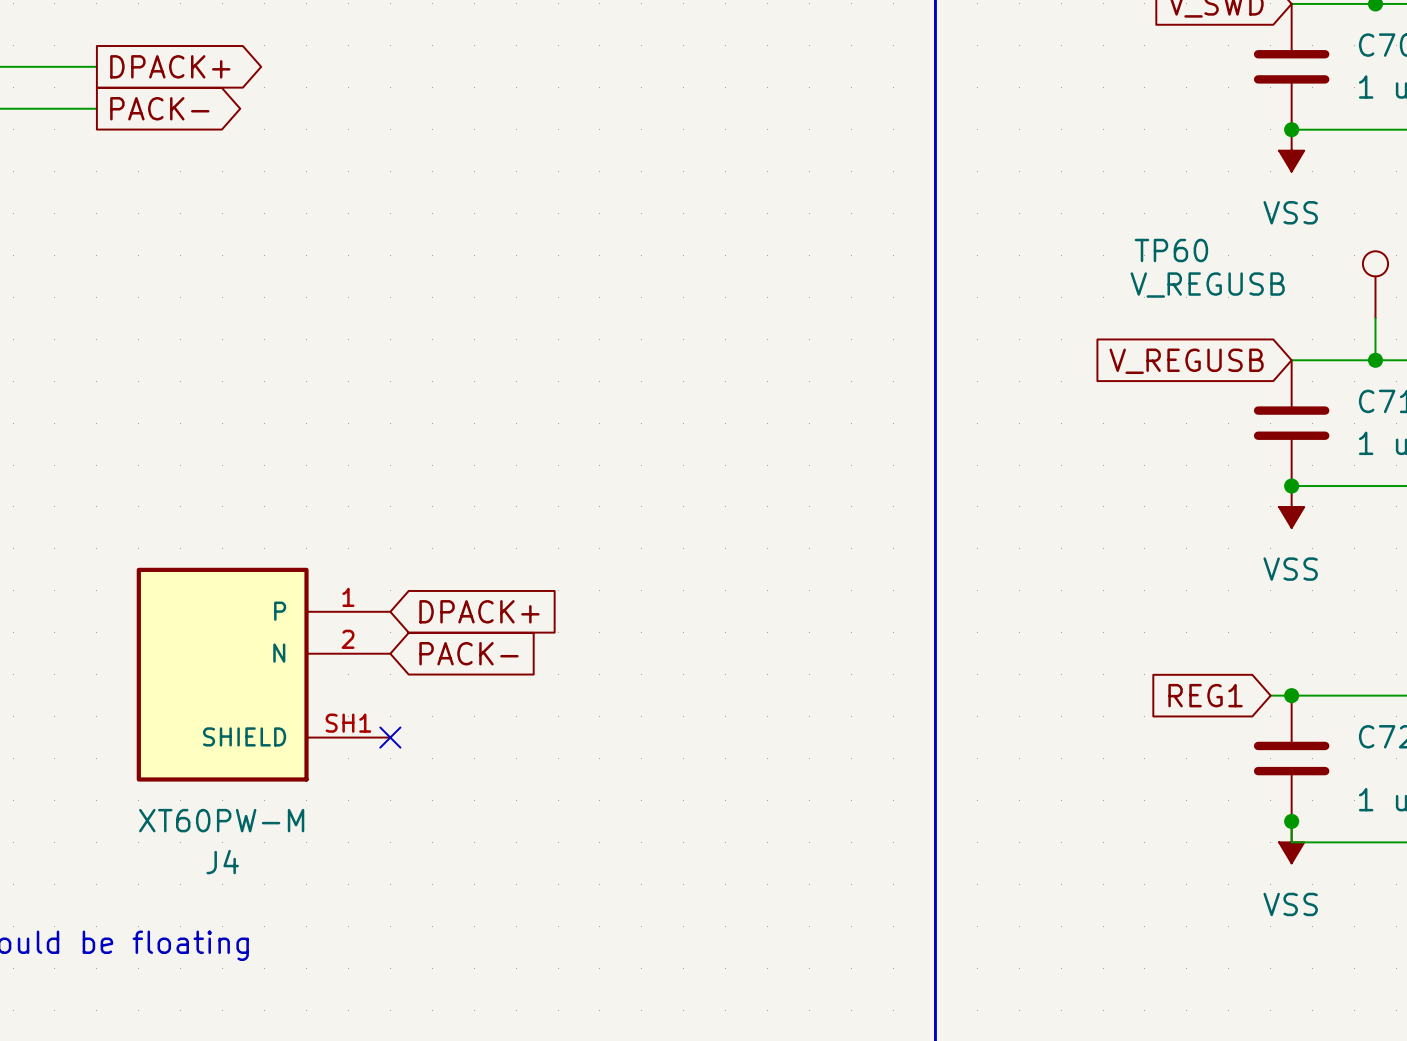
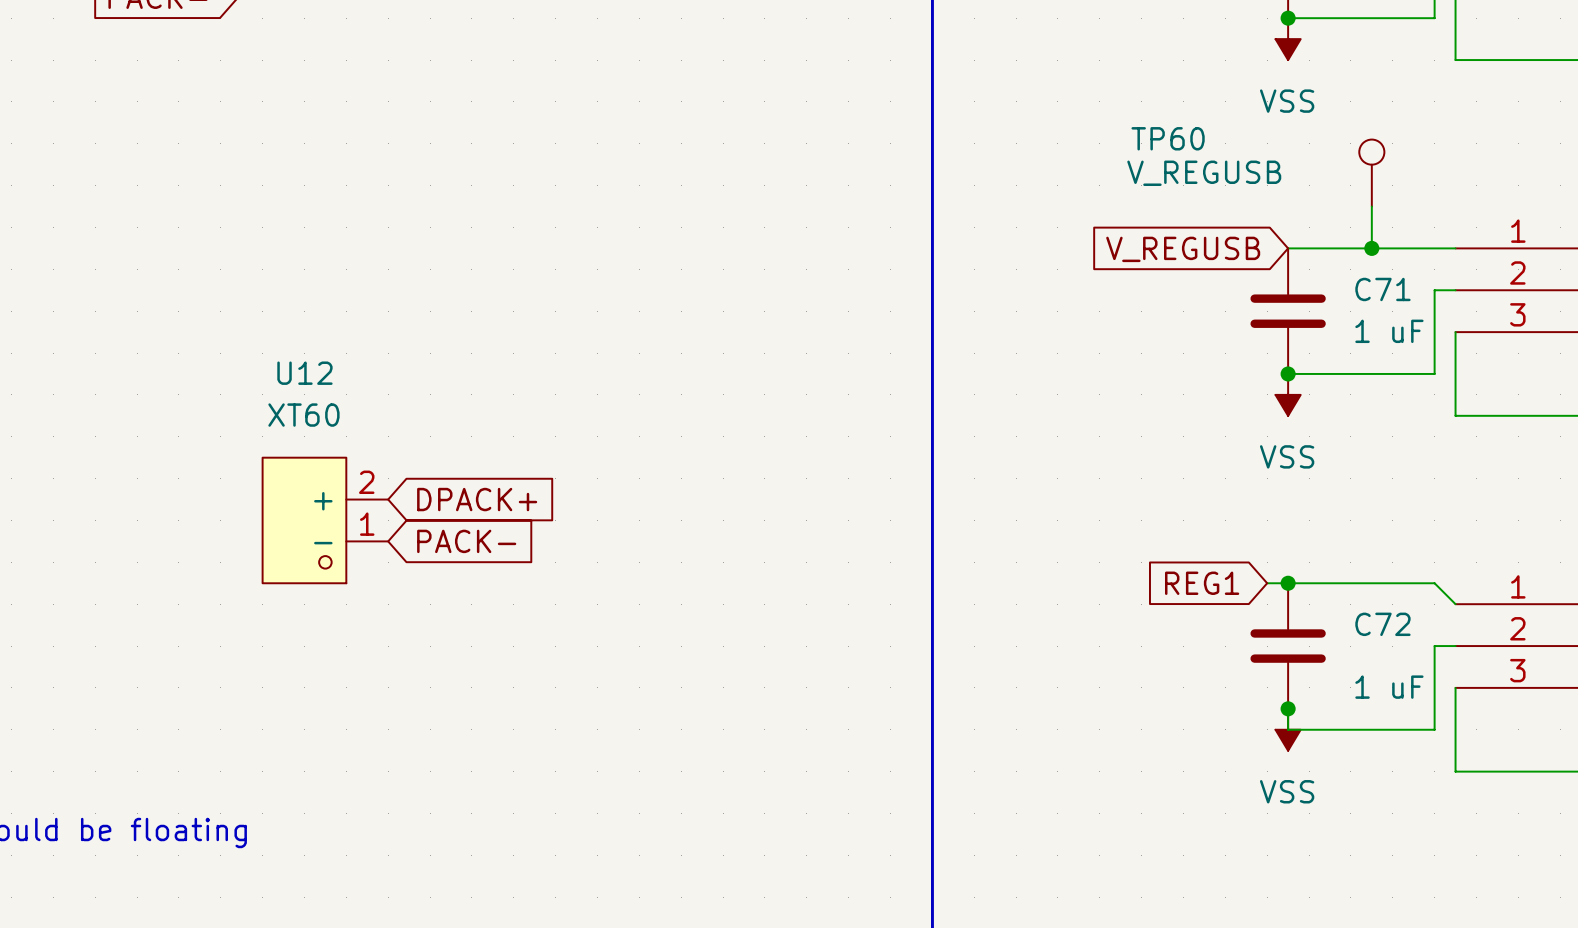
U12: none -> XT60 (325, 520)
J4: XT60PW-M (263, 674) -> none
no-connect mark: (390, 737) -> none

